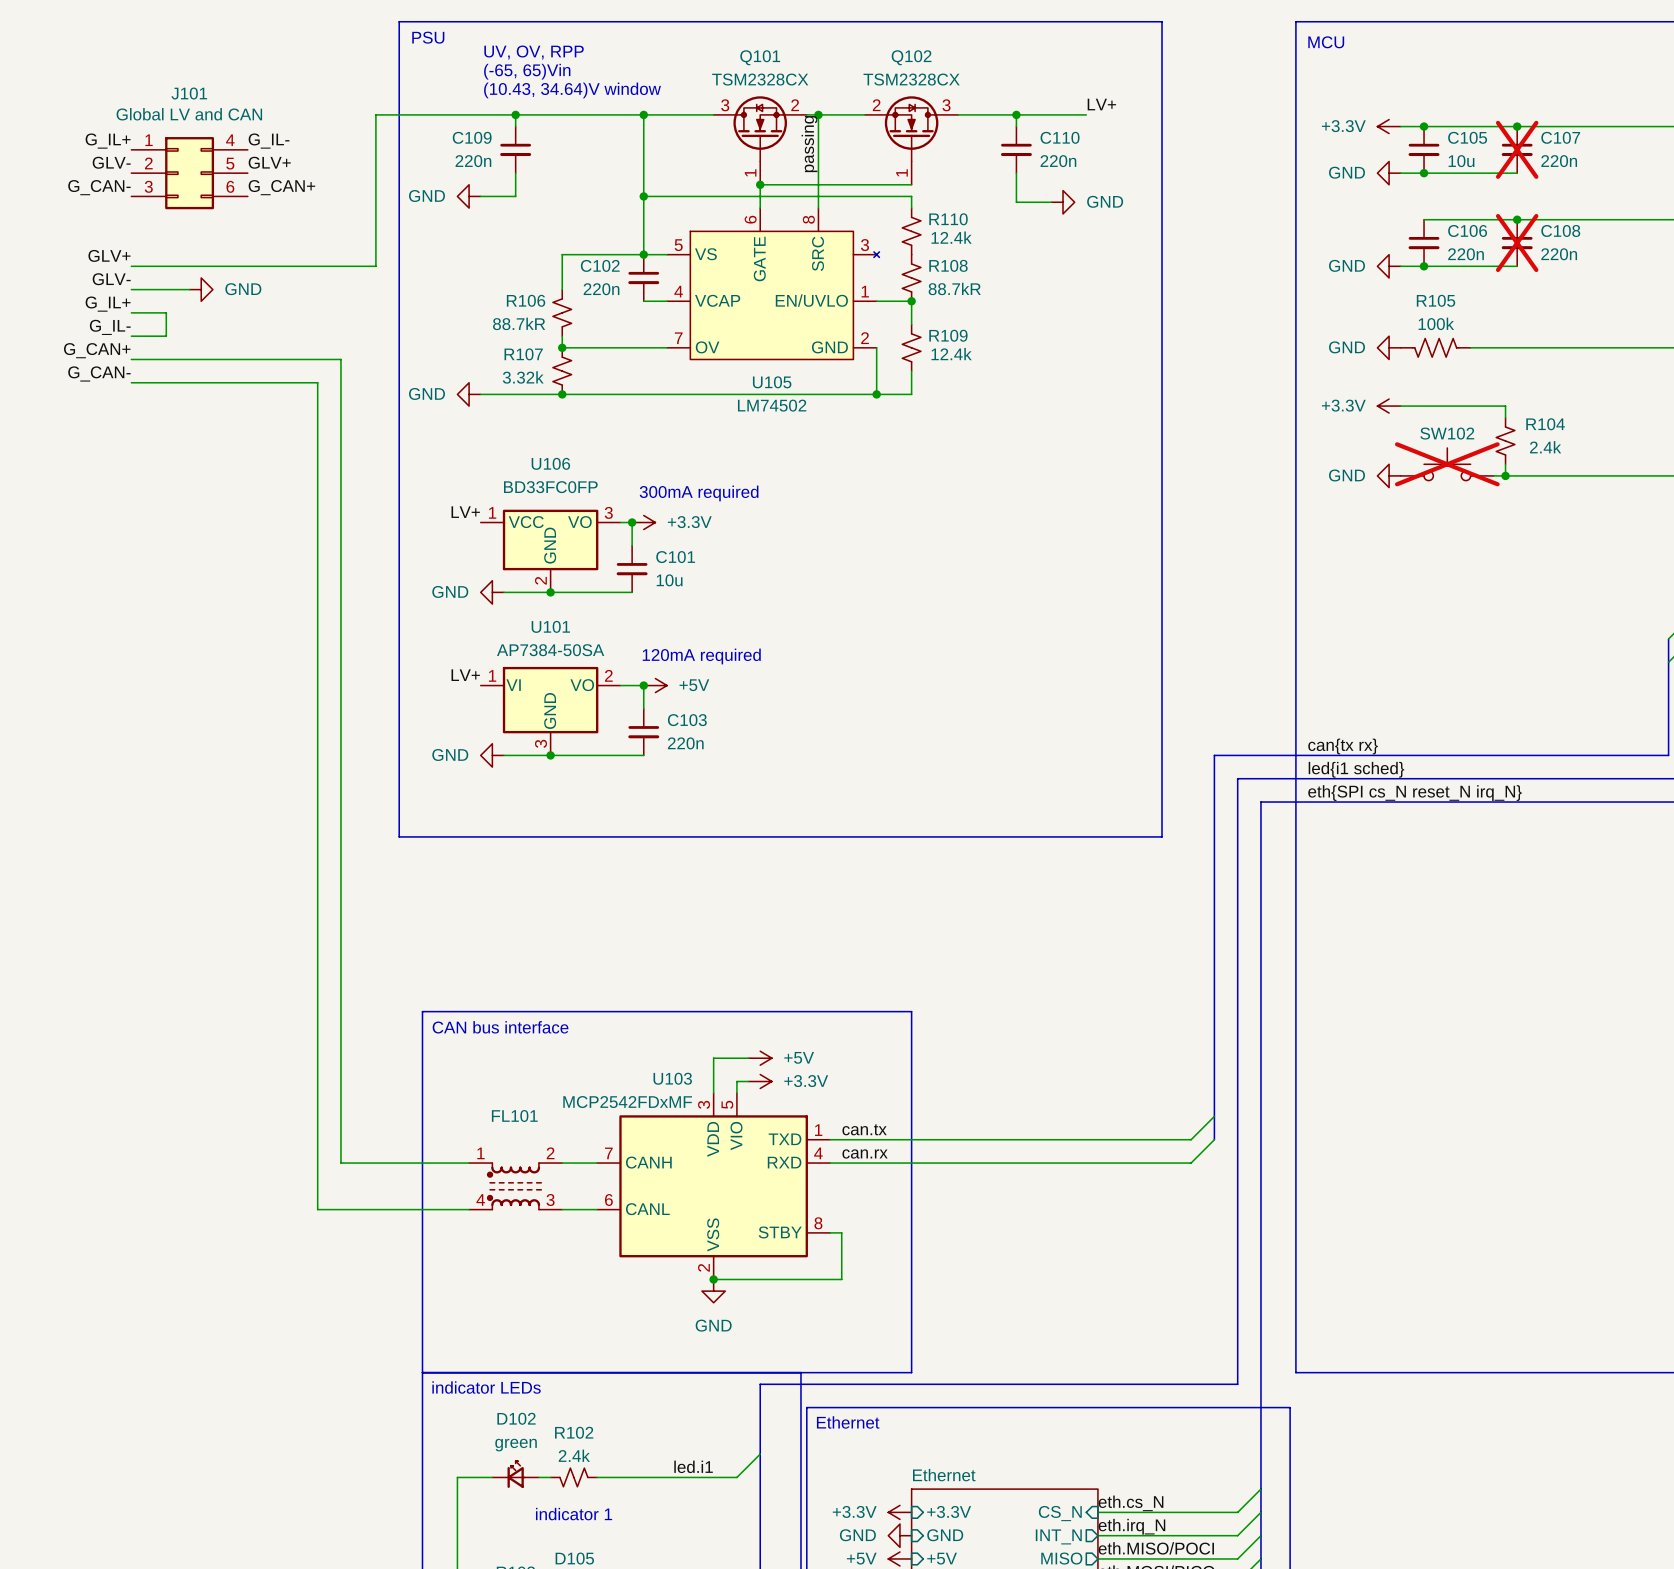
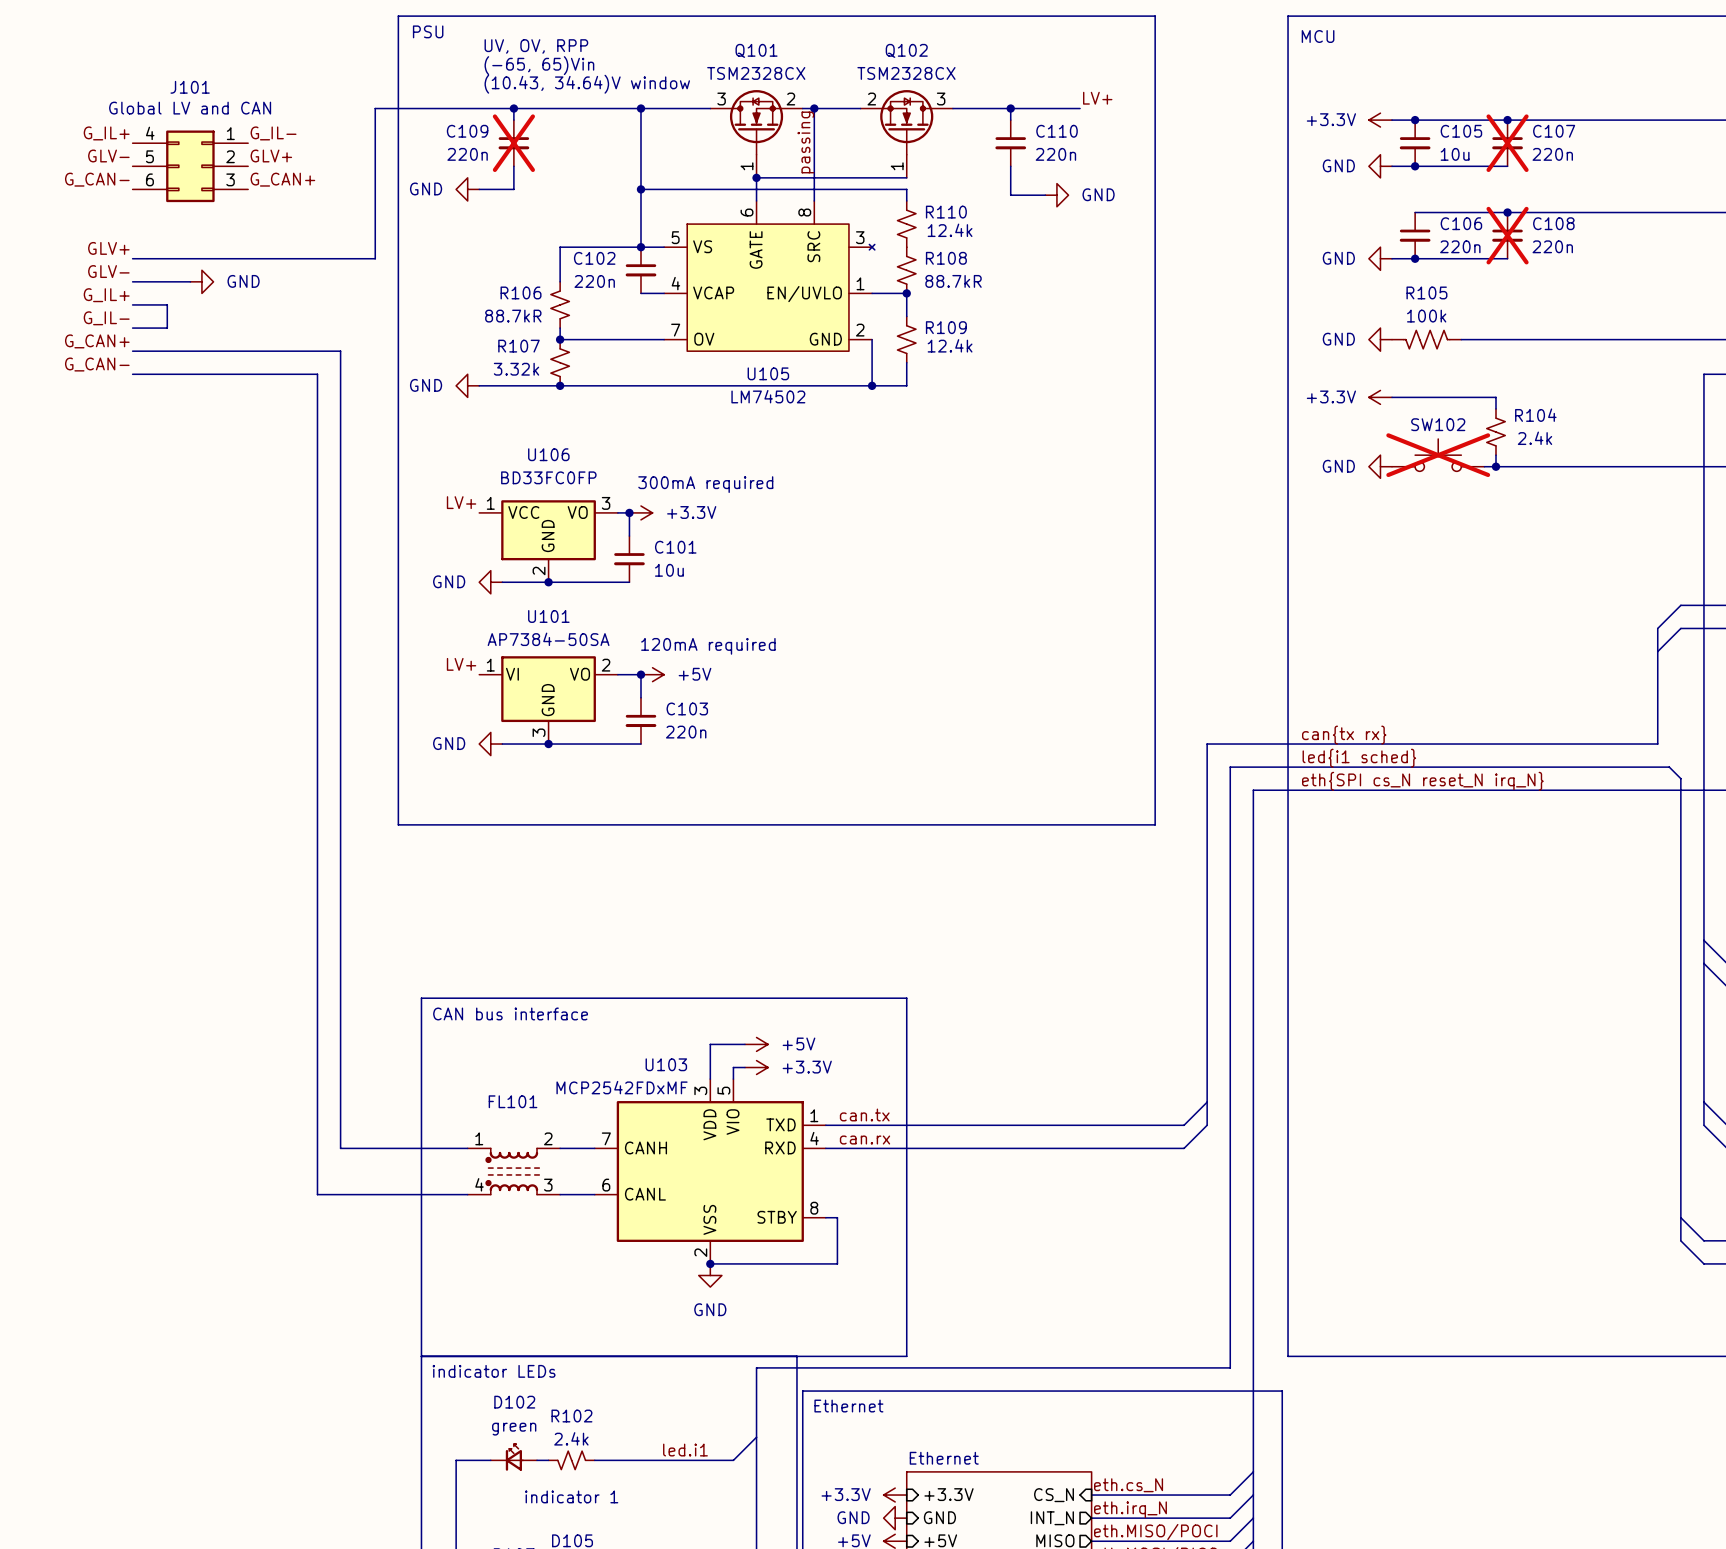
C109 do-not-place cross: none -> (513, 143)
J101 flip: as is (189, 173) -> left-right (190, 166)

